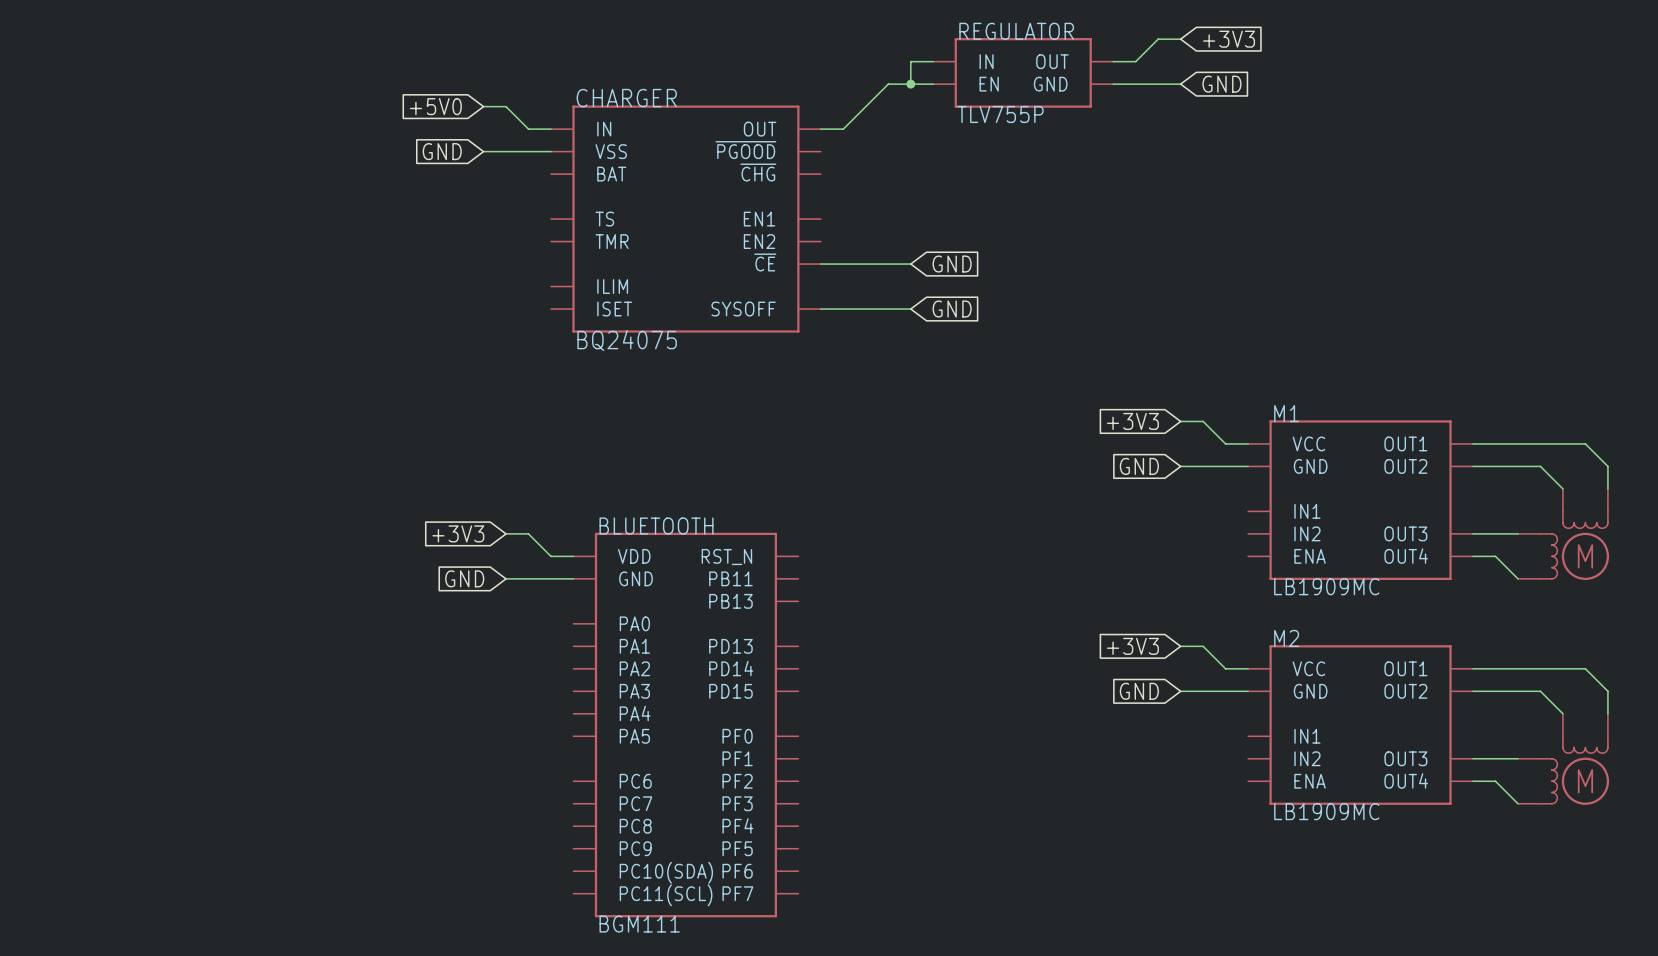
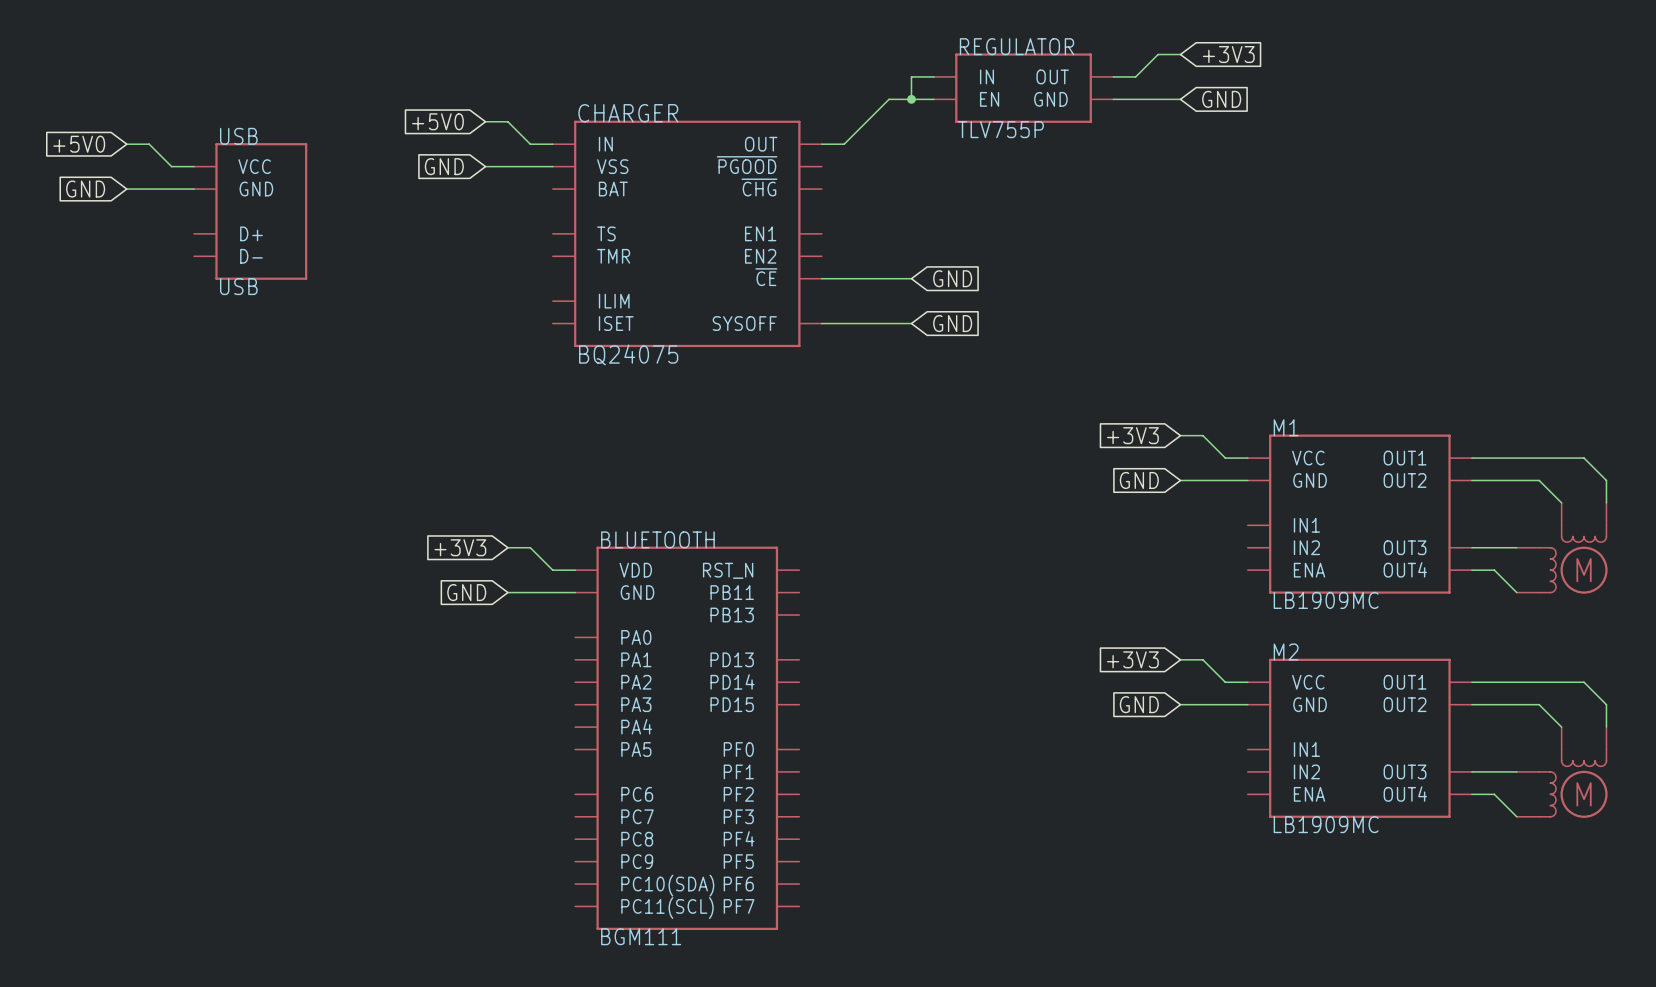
global label: none -> +5V0 (79, 144)
wire: none -> (126, 144) (149, 144) (171, 166) (194, 166)
global label: none -> GND (85, 189)
wire: none -> (126, 189) (194, 189)
USB: none -> USB (250, 211)

